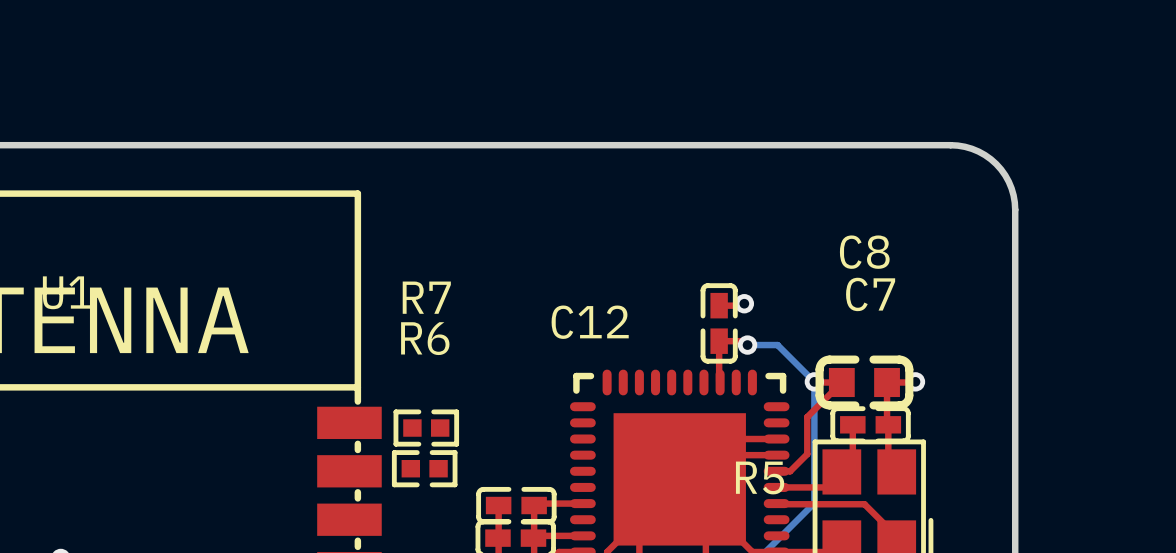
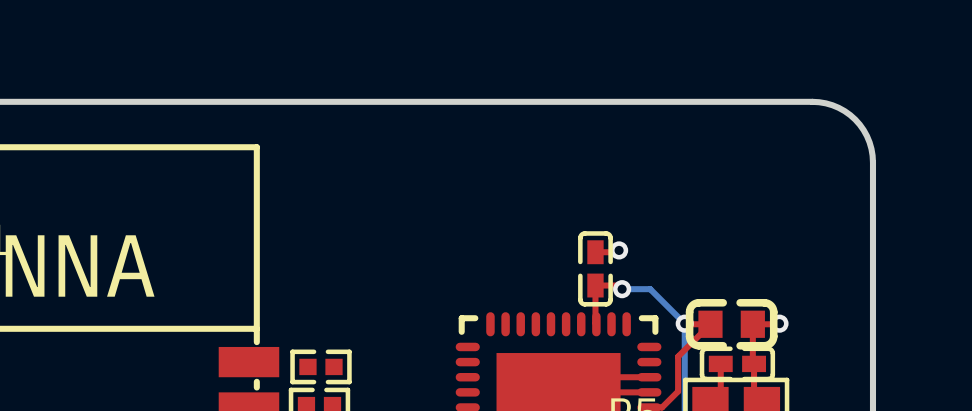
C8 name: C8 (864, 252) -> none
C7 name: C7 (870, 294) -> none
R7 name: R7 (426, 297) -> none
C12 name: C12 (590, 322) -> none
R6 name: R6 (425, 338) -> none

